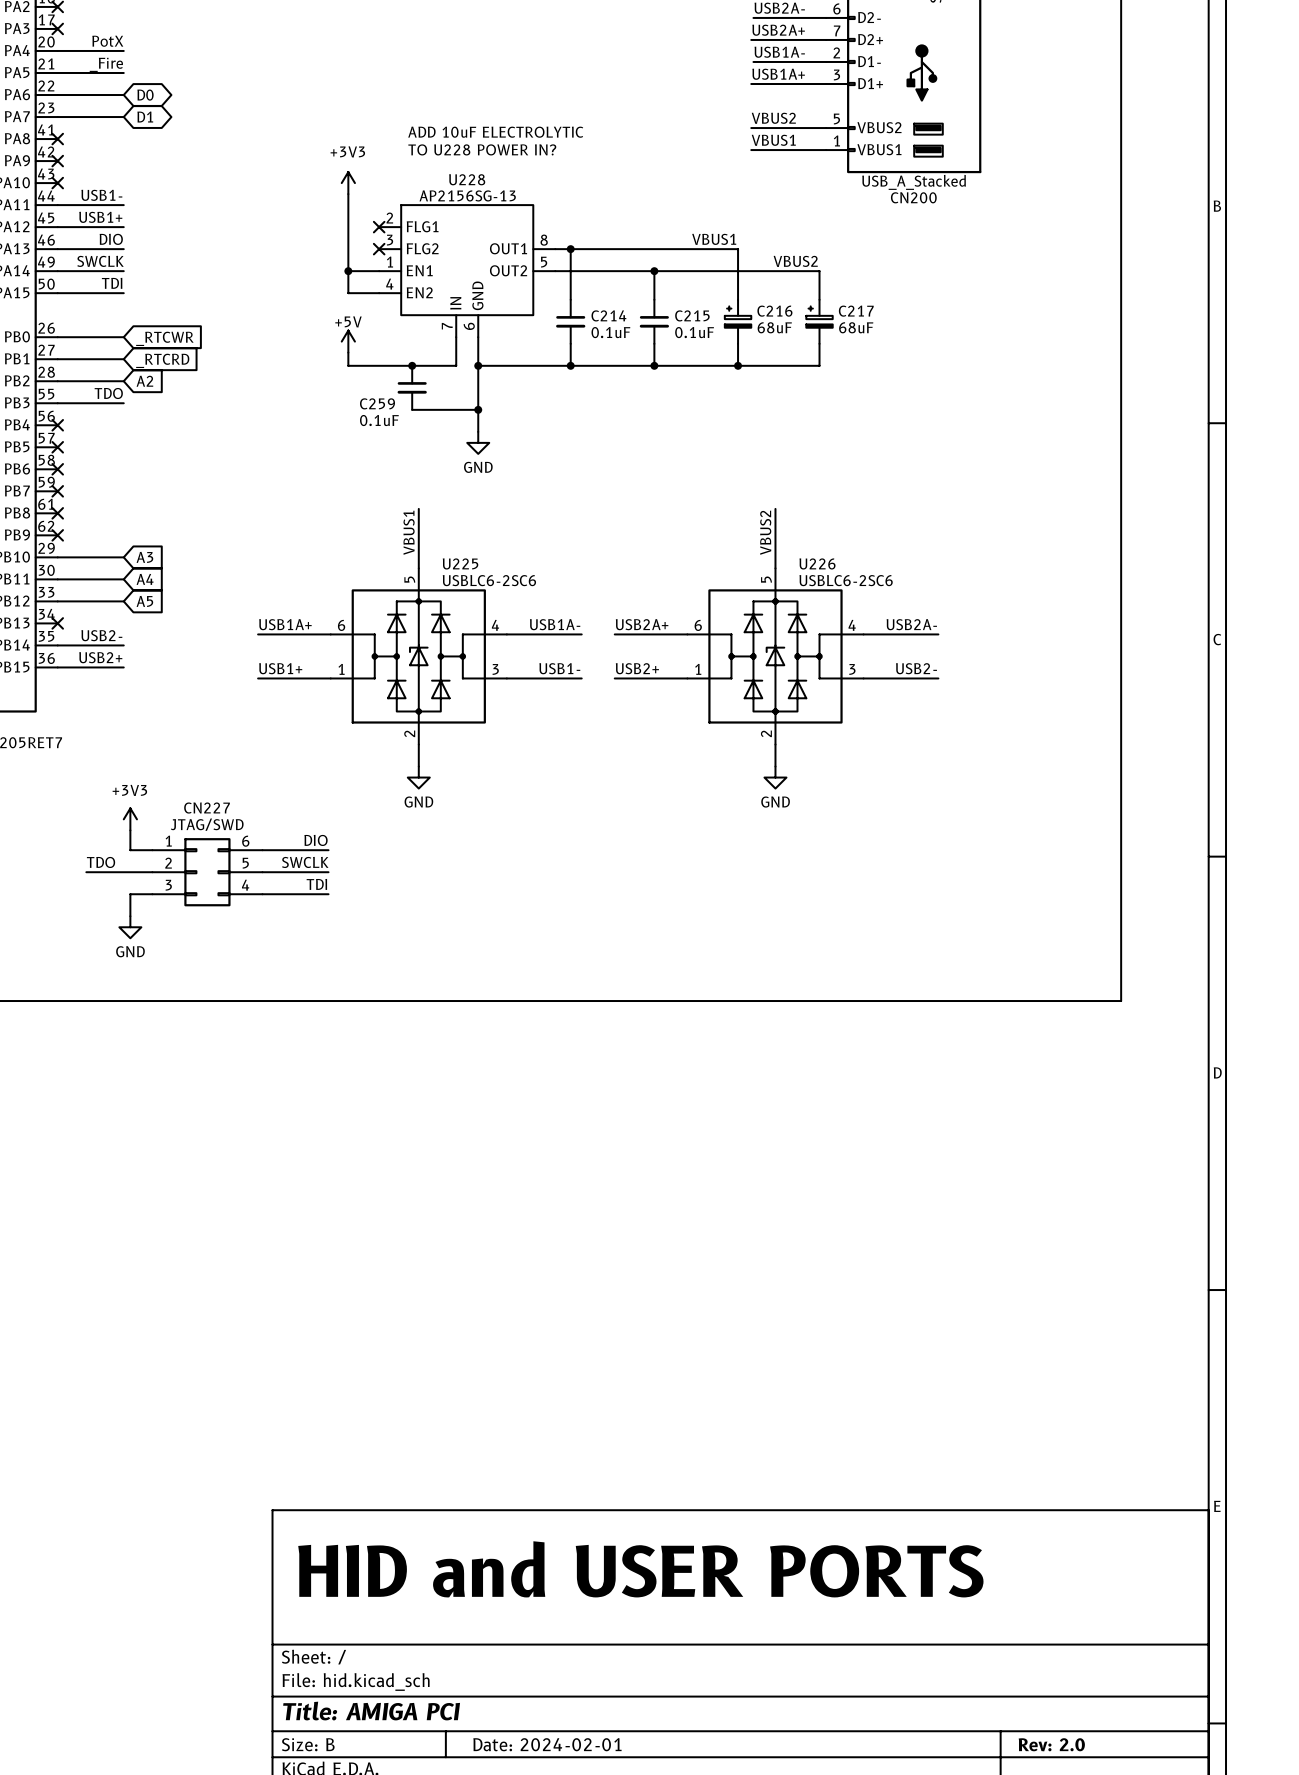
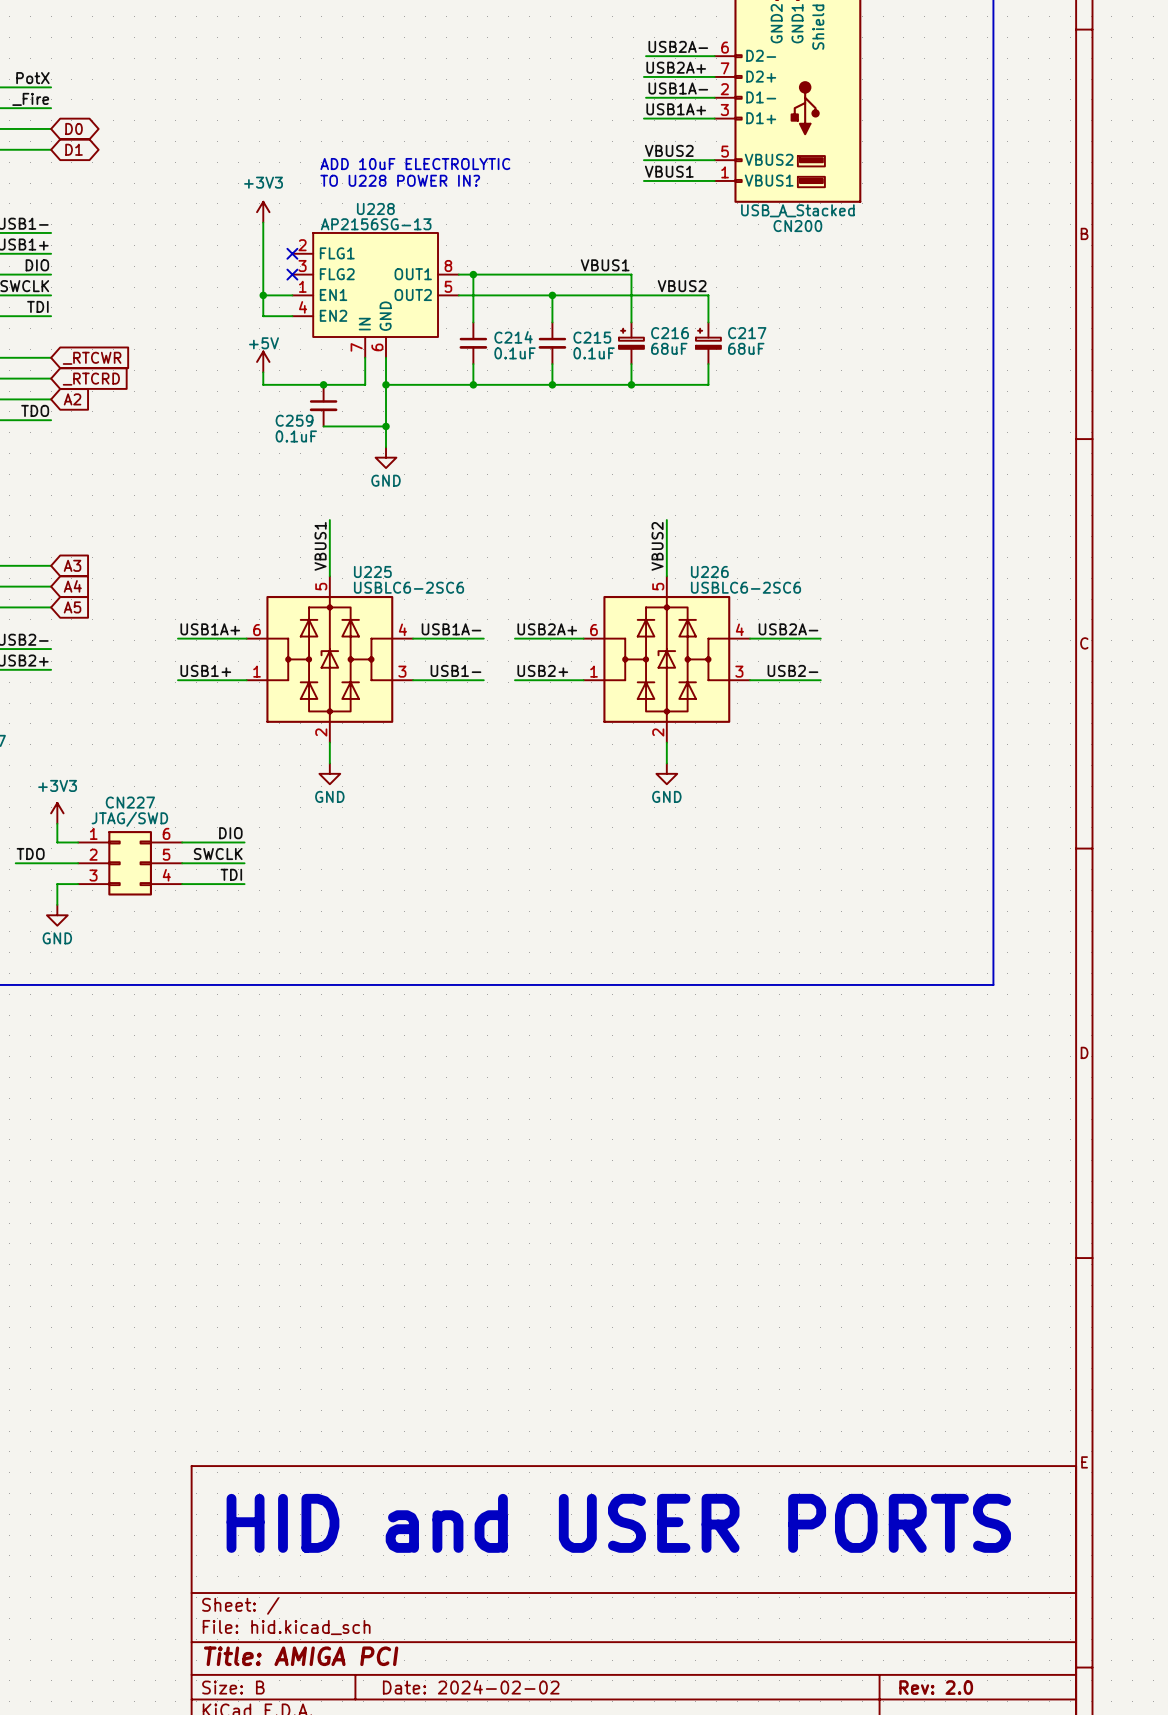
title block: Date: 2024-02-01 (547, 1744) -> Date: 2024-02-02 (471, 1687)

